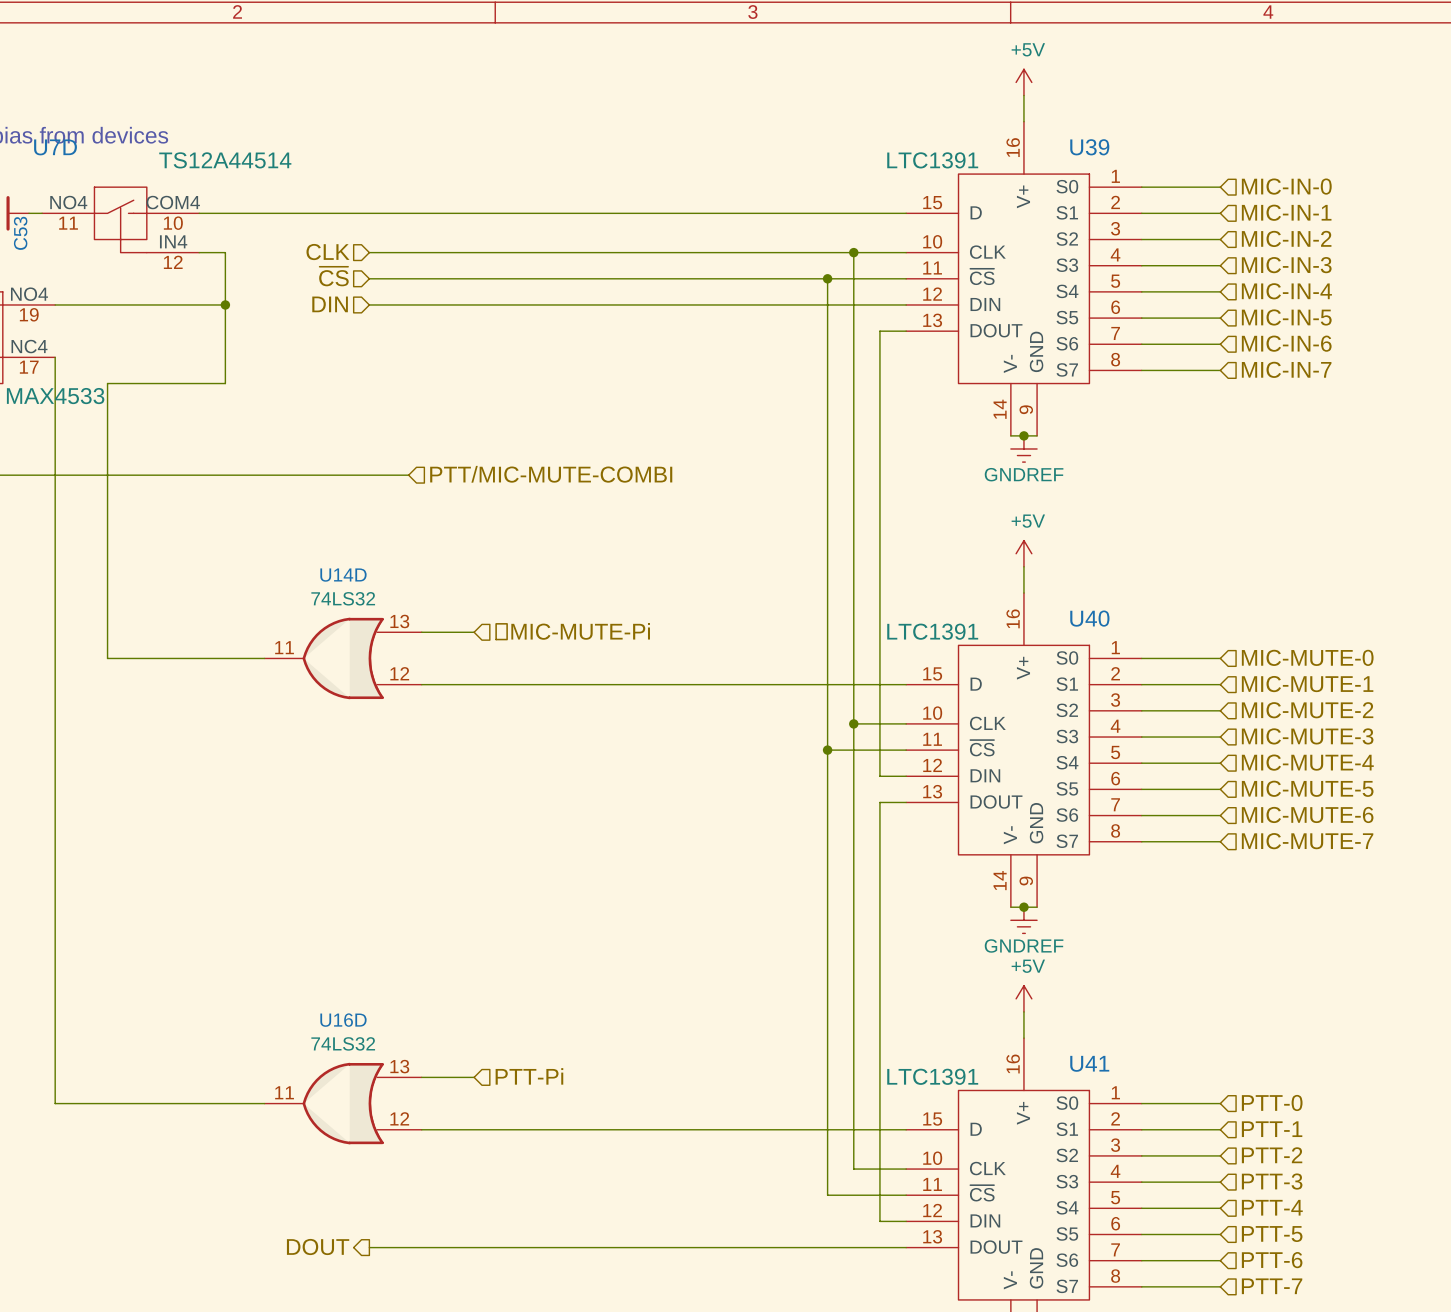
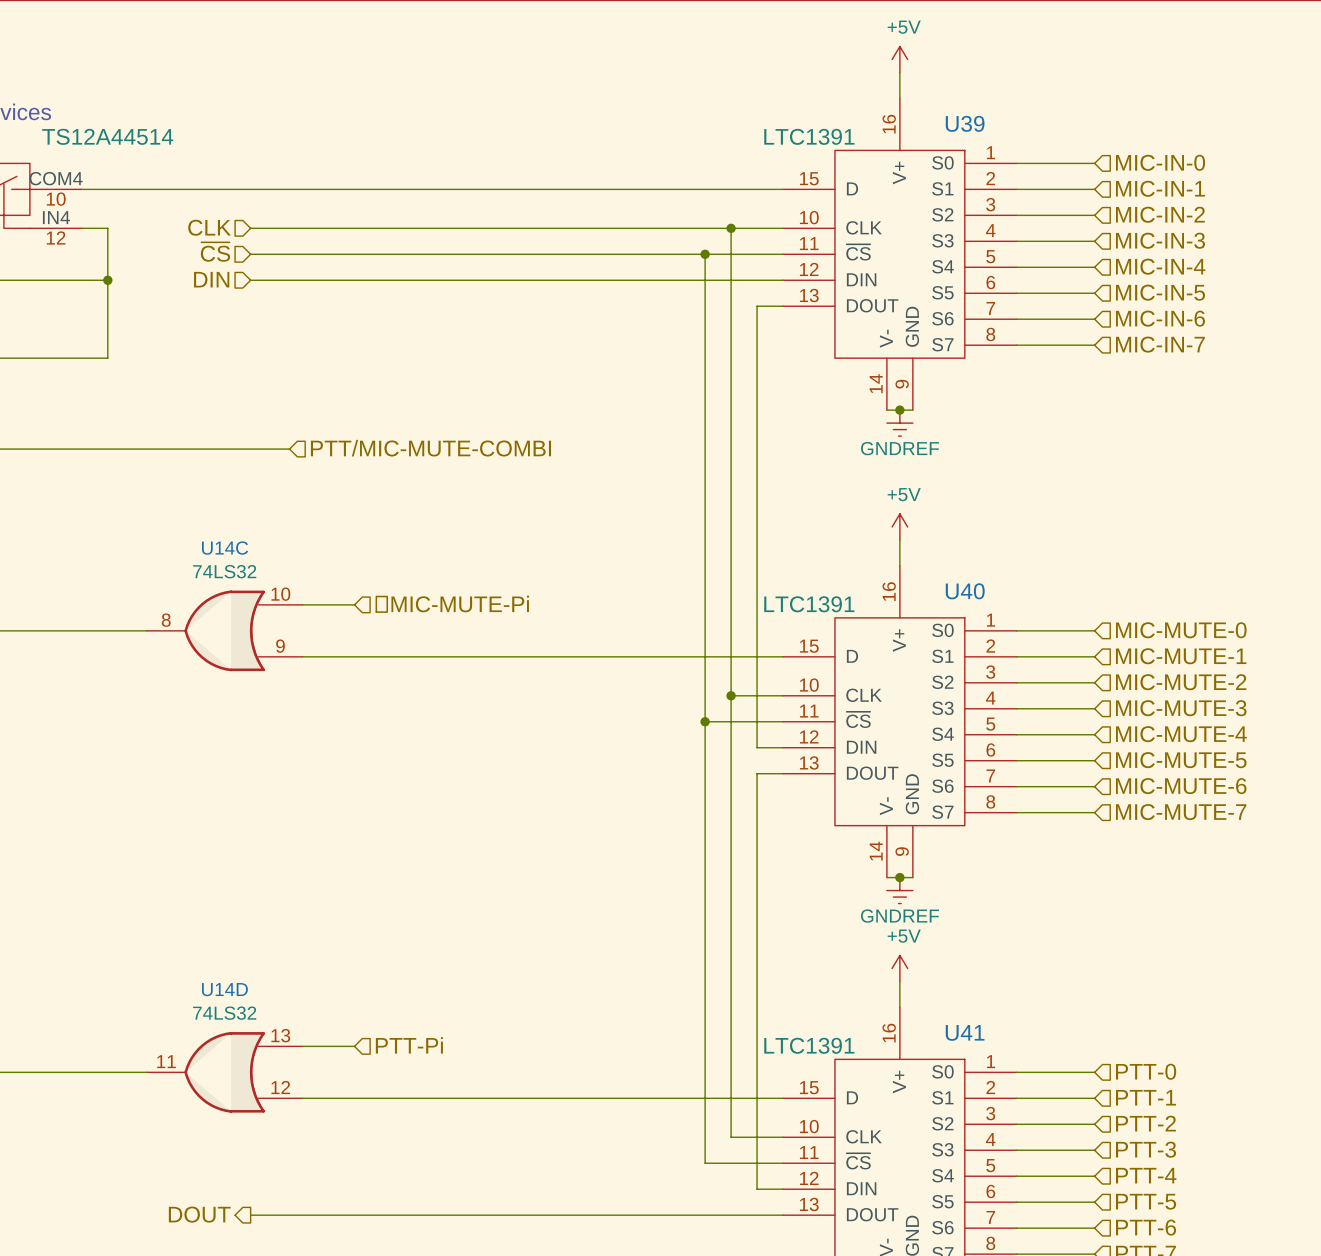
U14D name: U14D (343, 575) -> U14C (225, 548)
U14D pin number: 13 (399, 621) -> 10 (280, 594)
U14D pin number: 11 (284, 647) -> 8 (166, 620)
U14D pin number: 12 (399, 673) -> 9 (280, 646)
U16D name: U16D (343, 1020) -> U14D (224, 989)

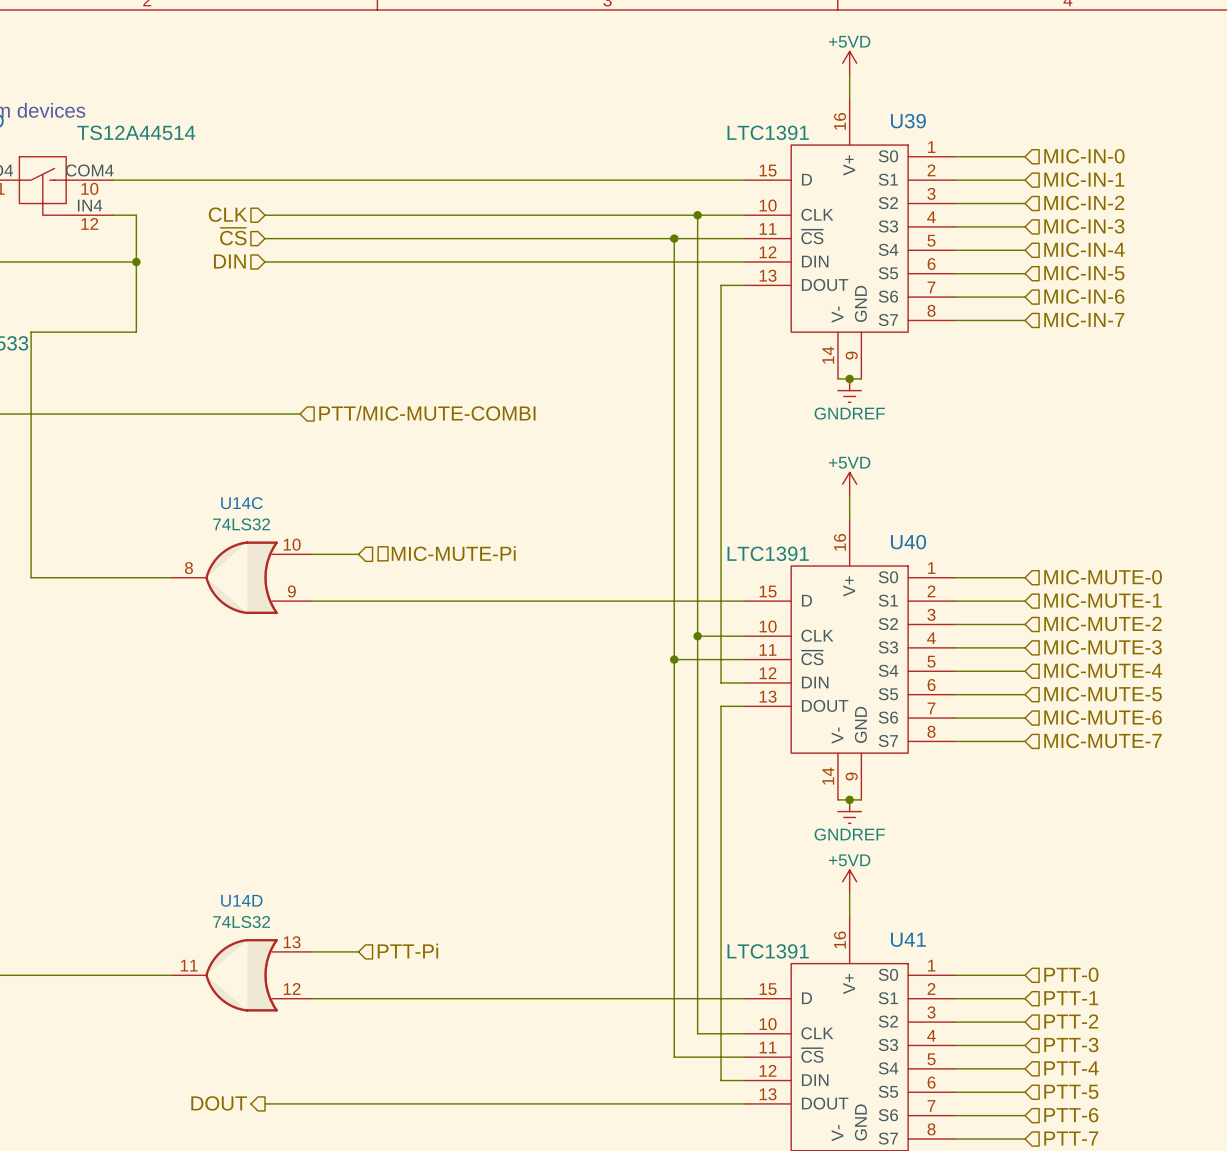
power symbol: +5V (899, 59) -> +5VD (849, 63)
power symbol: +5V (899, 526) -> +5VD (849, 484)
power symbol: +5V (899, 968) -> +5VD (849, 881)

